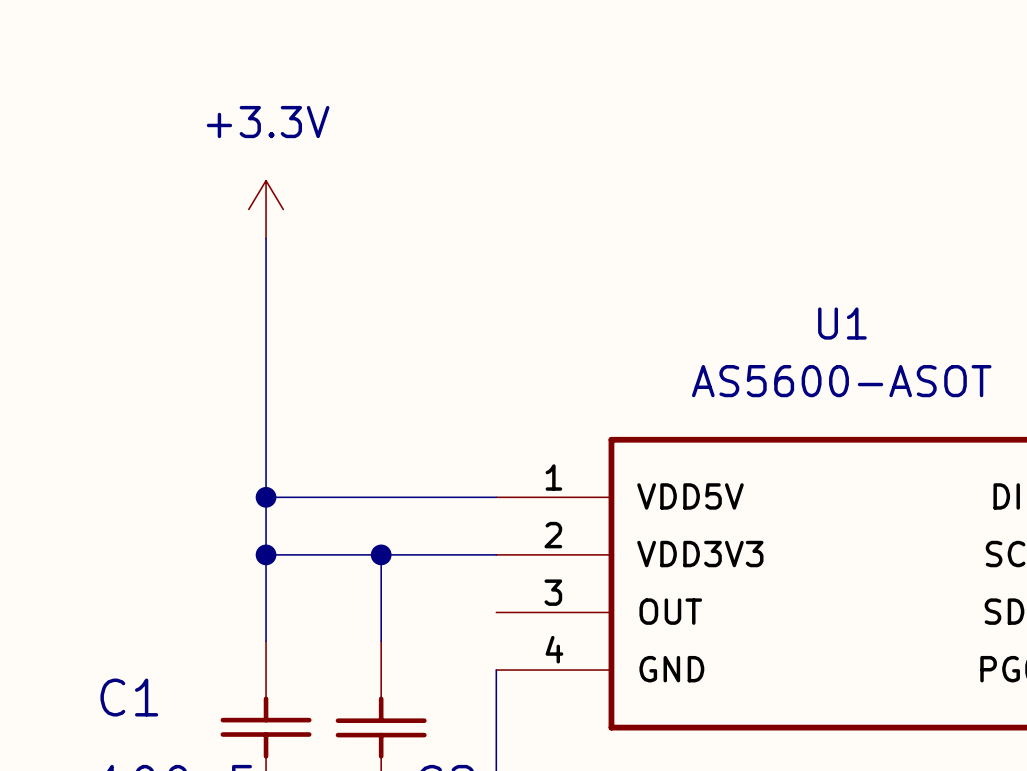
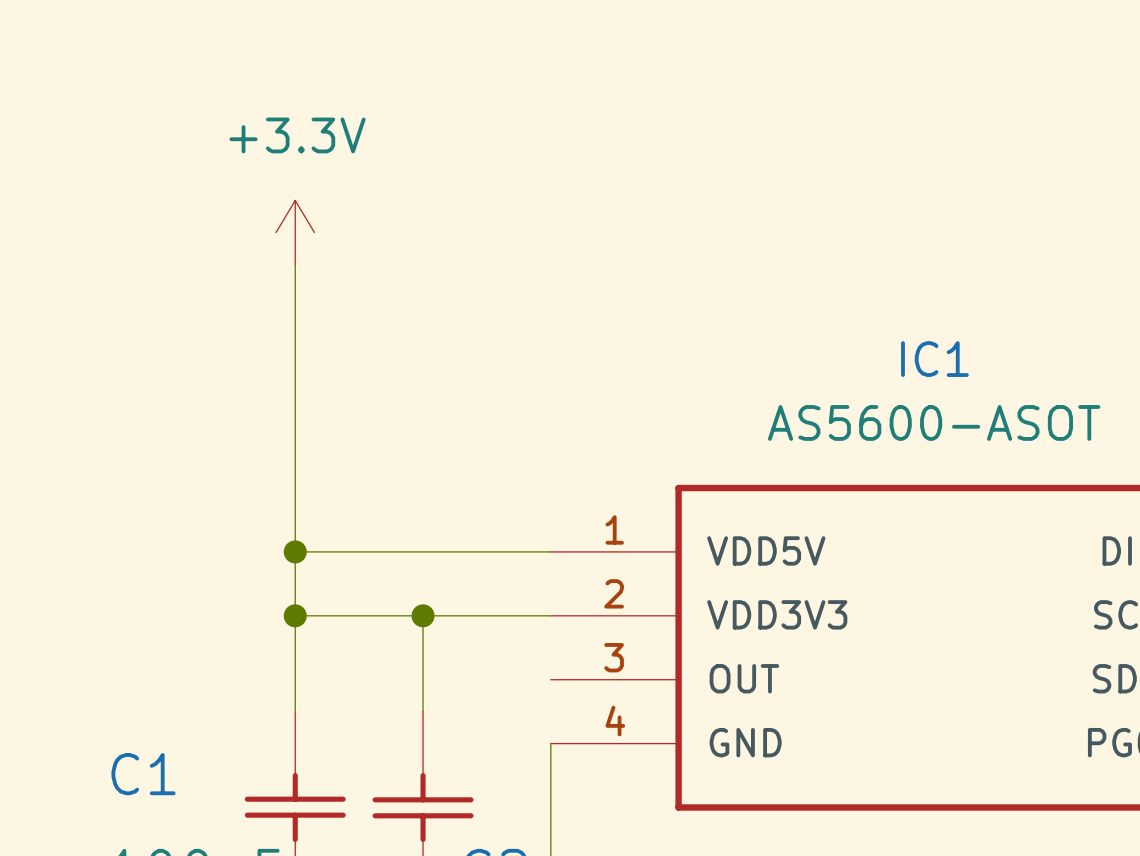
U1 name: U1 (842, 323) -> IC1 (934, 359)

